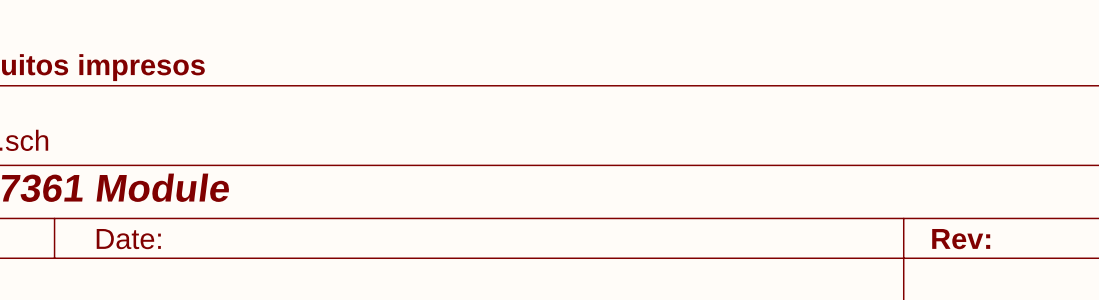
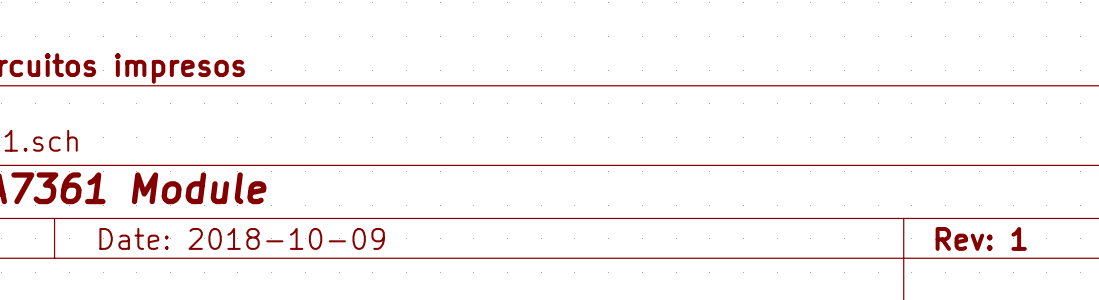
title block: Date: (128, 239) -> Date: 2018-10-09 (242, 238)
title block: Rev: (961, 239) -> Rev: 1 (981, 238)

